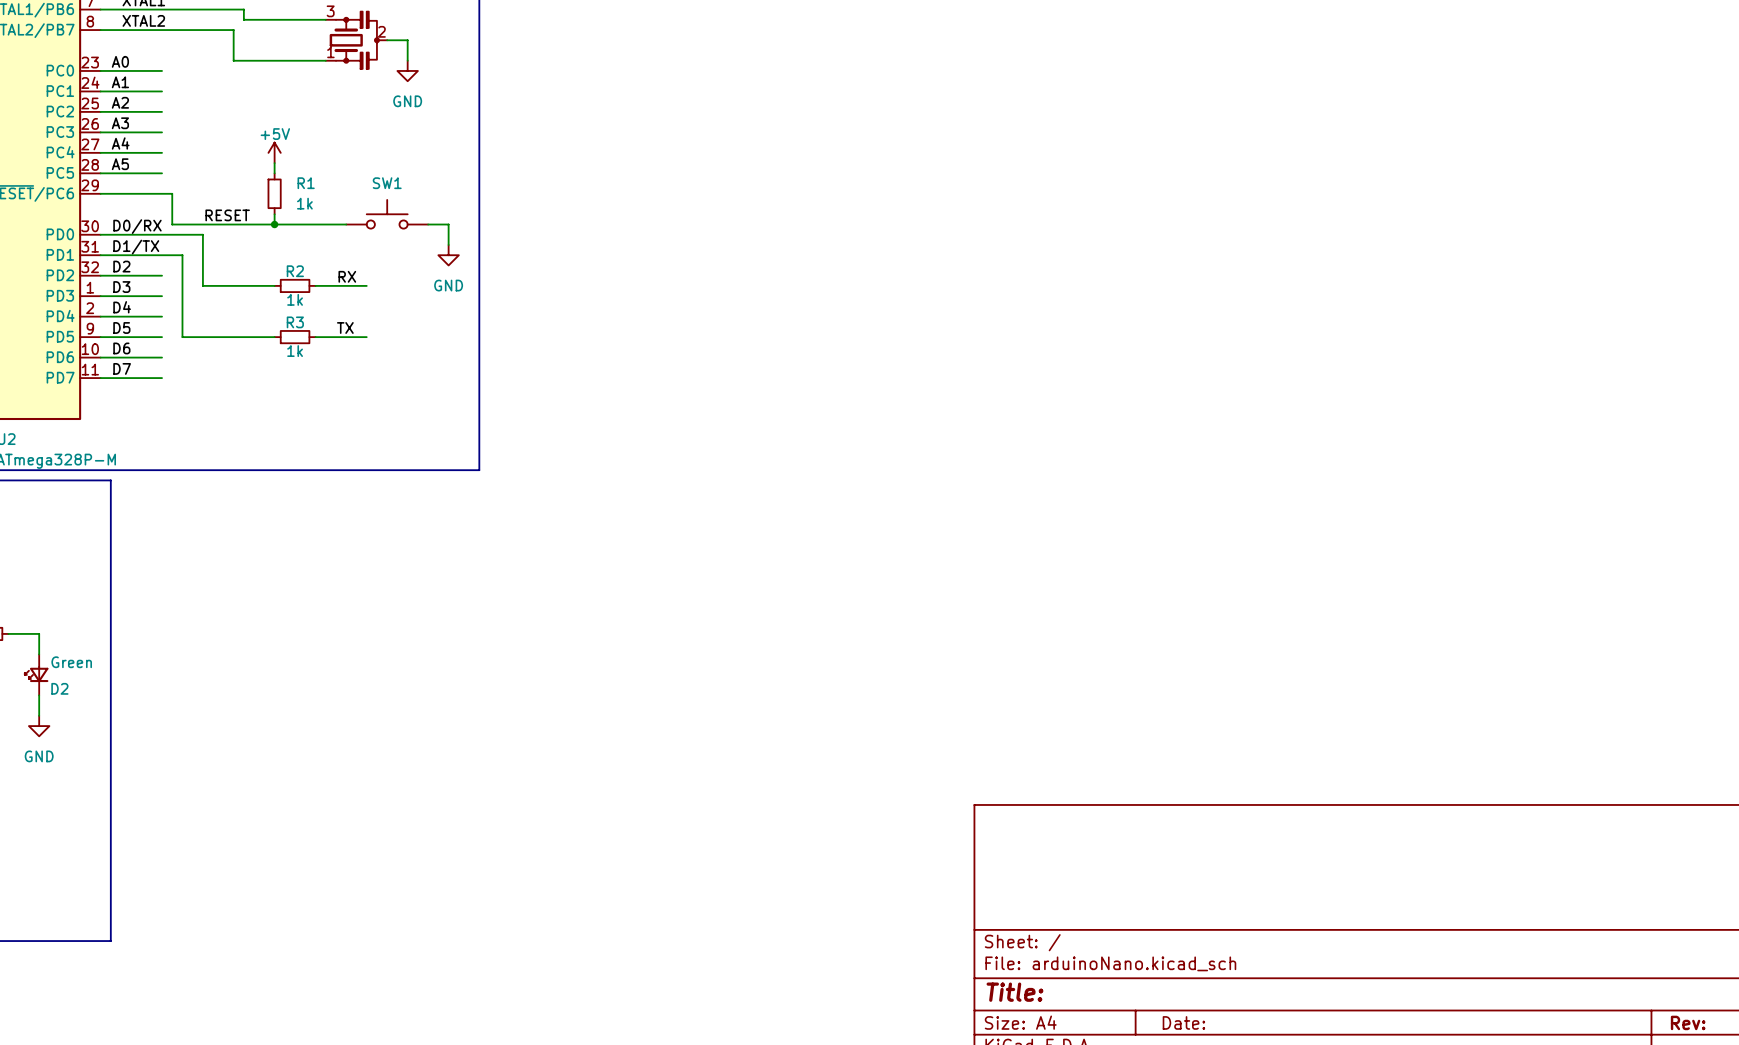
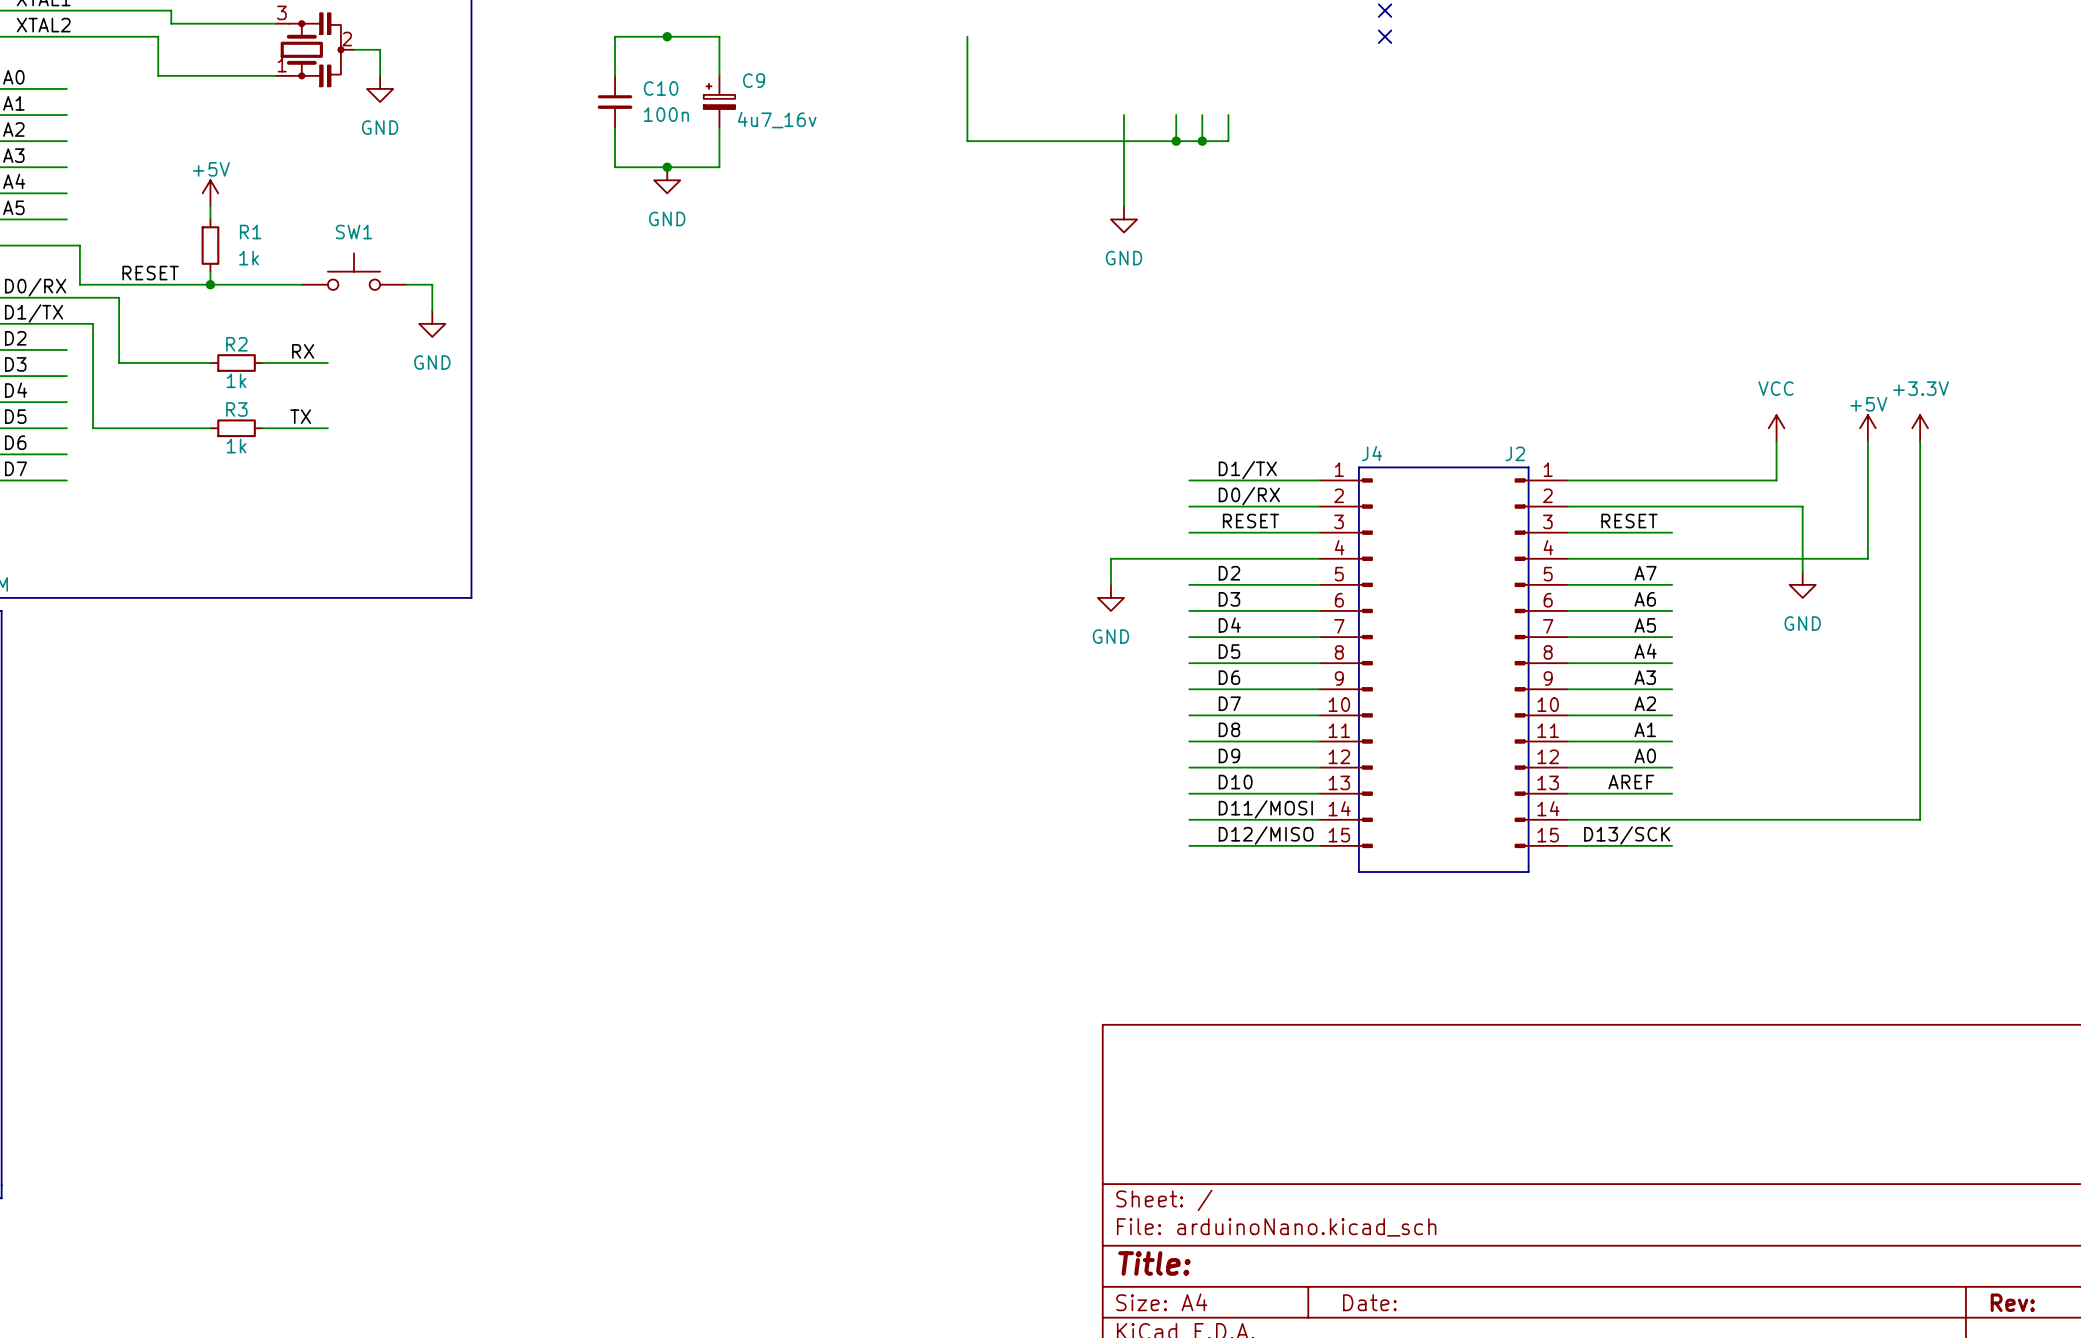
no-connect mark: none -> (1385, 10)
junction: none -> (667, 36)
wire: none -> (967, 36) (967, 141) (1228, 141) (1228, 115)
no-connect mark: none -> (1385, 36)
wire: none -> (615, 75) (615, 36) (719, 36) (719, 75)
C10: none -> 100n (615, 101)
C9: none -> 4u7_16v (719, 101)
wire: none -> (1124, 115) (1124, 206)
wire: none -> (1176, 115) (1176, 141)
wire: none -> (1202, 115) (1202, 141)
wire: none -> (615, 128) (615, 167) (719, 167) (719, 128)
junction: none -> (1176, 141)
junction: none -> (1202, 141)
junction: none -> (667, 167)
power symbol: none -> GND (667, 180)
power symbol: none -> GND (1124, 219)
power symbol: none -> VCC (1776, 428)
power symbol: none -> +5V (1867, 428)
power symbol: none -> +3.3V (1920, 428)
wire: none -> (1776, 441) (1776, 480) (1567, 480)
wire: none -> (1867, 441) (1867, 558) (1567, 558)
wire: none -> (1920, 441) (1920, 819) (1567, 819)
line: none -> (1358, 467) (1528, 467) (1528, 872) (1358, 872) (1358, 467)
label: none -> D1/TX (1247, 470)
wire: none -> (1189, 480) (1319, 480)
label: none -> D0/RX (1249, 496)
wire: none -> (1189, 506) (1319, 506)
wire: none -> (1567, 506) (1802, 506) (1802, 571)
label: none -> RESET (1251, 521)
label: none -> RESET (1629, 521)
wire: none -> (1189, 532) (1319, 532)
wire: none -> (1567, 532) (1672, 532)
wire: none -> (1319, 558) (1110, 558) (1110, 584)
label: none -> D2 (1229, 573)
label: none -> A7 (1645, 573)
wire: none -> (1189, 584) (1319, 584)
wire: none -> (1567, 584) (1672, 584)
power symbol: none -> GND (1802, 584)
power symbol: none -> GND (1110, 597)
label: none -> D3 (1229, 599)
label: none -> A6 (1645, 599)
wire: none -> (1189, 610) (1319, 610)
wire: none -> (1567, 610) (1672, 610)
label: none -> D4 (1229, 625)
label: none -> A5 (1645, 625)
wire: none -> (1189, 637) (1319, 637)
wire: none -> (1567, 637) (1672, 637)
label: none -> A4 (1645, 651)
label: none -> D5 (1229, 651)
wire: none -> (1189, 663) (1319, 663)
J4: none -> (1346, 663)
J2: none -> (1541, 663)
wire: none -> (1567, 663) (1672, 663)
label: none -> D6 (1229, 677)
label: none -> A3 (1645, 677)
wire: none -> (1189, 689) (1319, 689)
wire: none -> (1567, 689) (1672, 689)
label: none -> D7 (1229, 703)
label: none -> A2 (1645, 703)
wire: none -> (1189, 715) (1319, 715)
wire: none -> (1567, 715) (1672, 715)
label: none -> D8 (1229, 729)
label: none -> A1 (1645, 729)
wire: none -> (1189, 741) (1319, 741)
wire: none -> (1567, 741) (1672, 741)
label: none -> D9 (1229, 755)
label: none -> A0 (1645, 755)
wire: none -> (1189, 767) (1319, 767)
wire: none -> (1567, 767) (1672, 767)
label: none -> D10 (1235, 782)
label: none -> AREF (1631, 782)
wire: none -> (1189, 793) (1319, 793)
wire: none -> (1567, 793) (1672, 793)
label: none -> D11/MOSI (1265, 809)
wire: none -> (1189, 819) (1319, 819)
label: none -> D12/MISO (1266, 835)
label: none -> D13/SCK (1627, 835)
wire: none -> (1189, 845) (1319, 845)
wire: none -> (1567, 845) (1672, 845)

